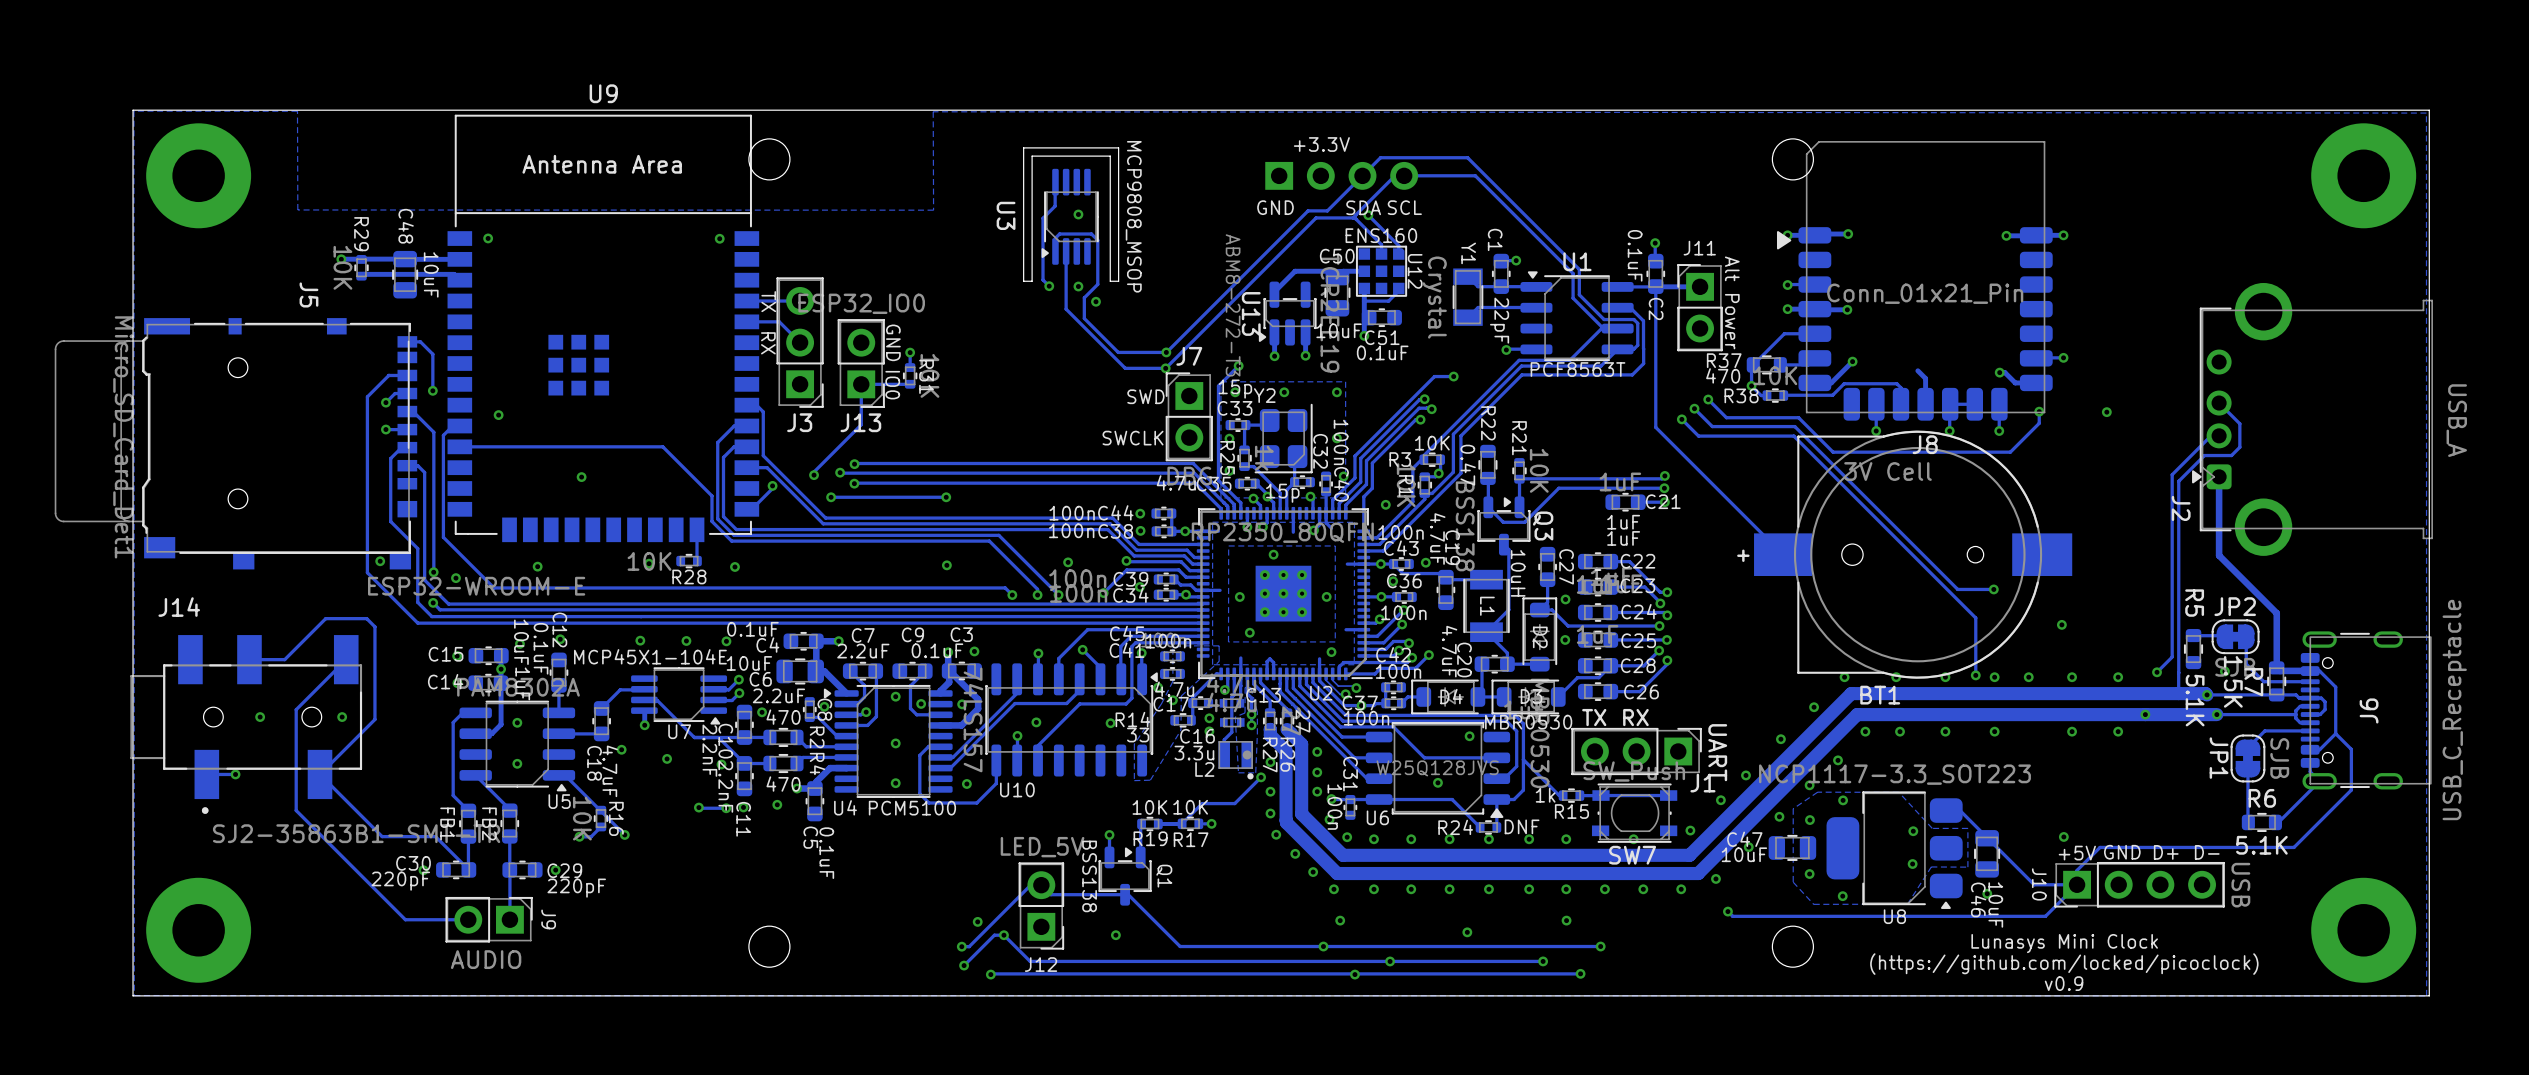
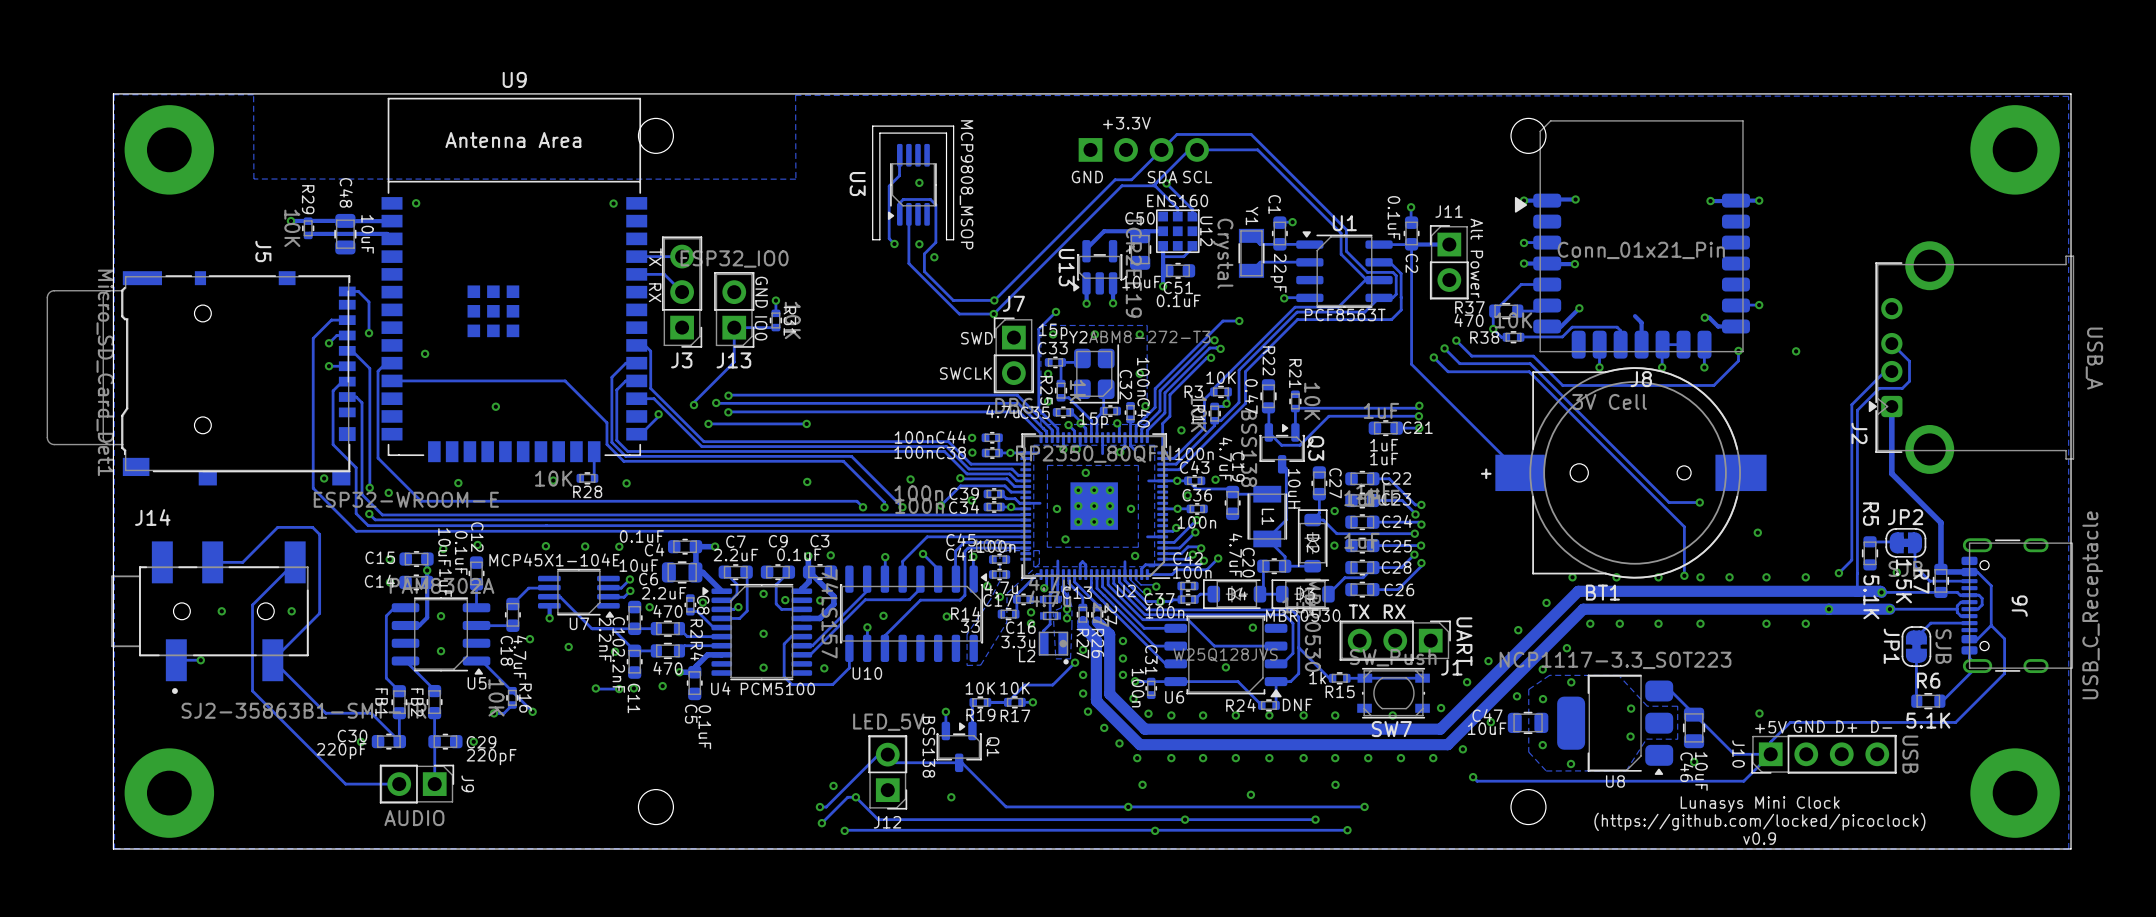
Y2 value rotation: 0° (1233, 305) -> 90° counterclockwise (1149, 336)

